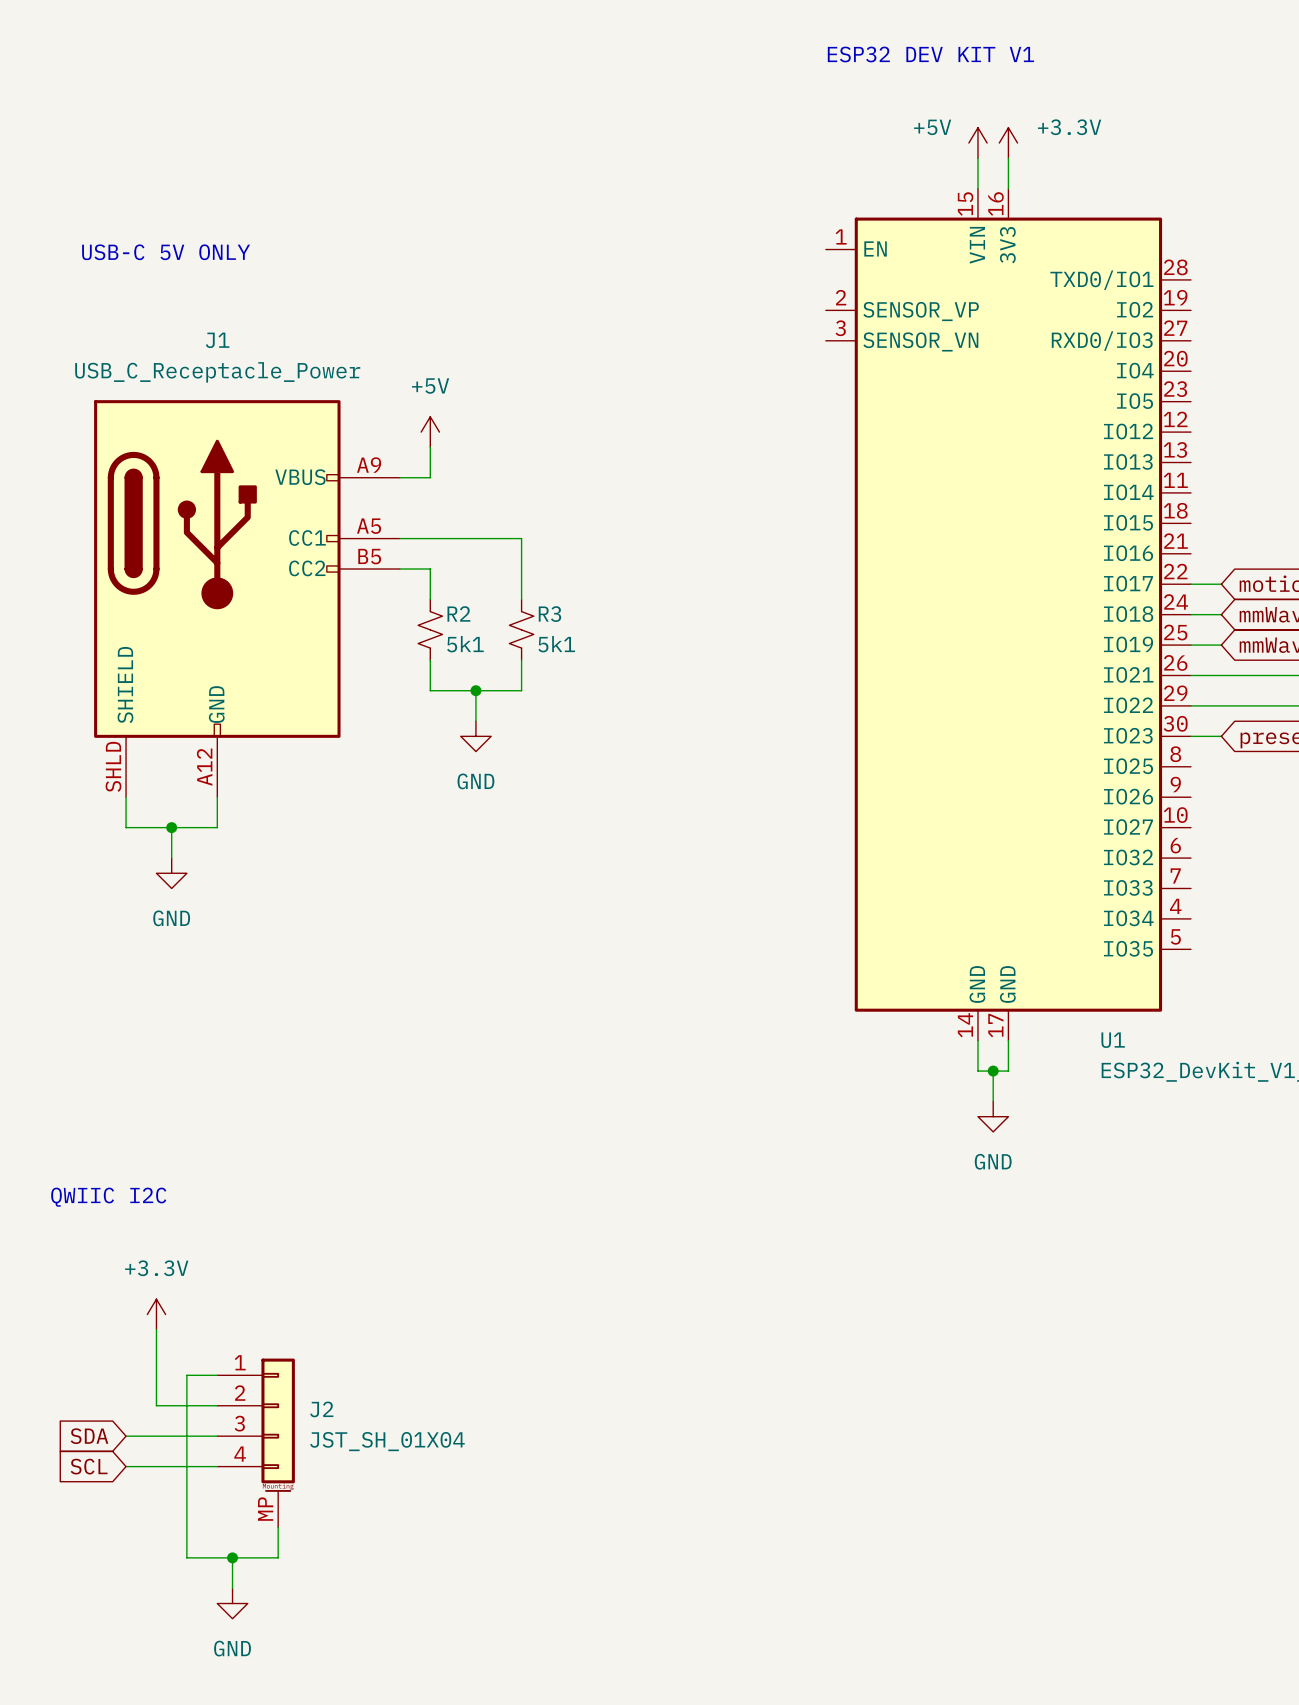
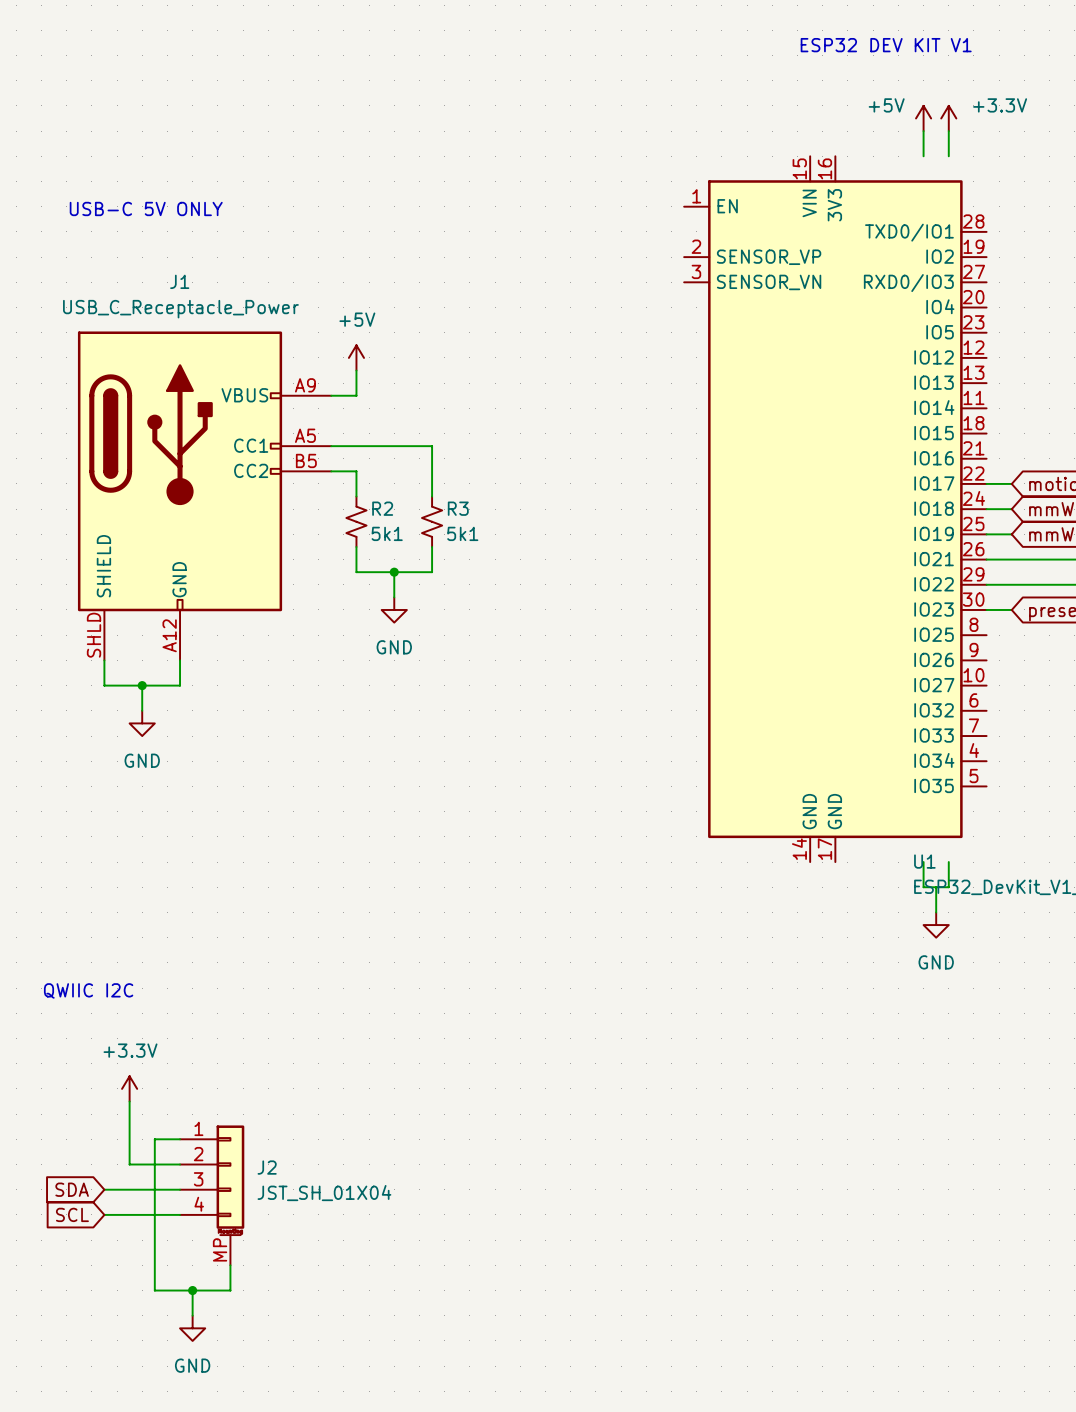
text position: ESP32 DEV KIT V1 (930, 54) -> ESP32 DEV KIT V1 (886, 45)
power symbol position: +5V (977, 143) -> +5V (923, 118)
power symbol position: +3.3V (1008, 143) -> +3.3V (948, 118)
wire: (977, 158) (977, 188) -> (923, 131) (923, 156)
wire: (1008, 158) (1008, 188) -> (948, 131) (948, 156)
wire: (977, 1040) (977, 1071) (1008, 1071) (1008, 1040) -> (923, 862) (923, 887) (948, 887) (948, 862)
wire: (993, 1071) (993, 1101) -> (936, 887) (936, 912)
junction: (993, 1071) -> none
power symbol position: GND (993, 1116) -> GND (936, 925)

